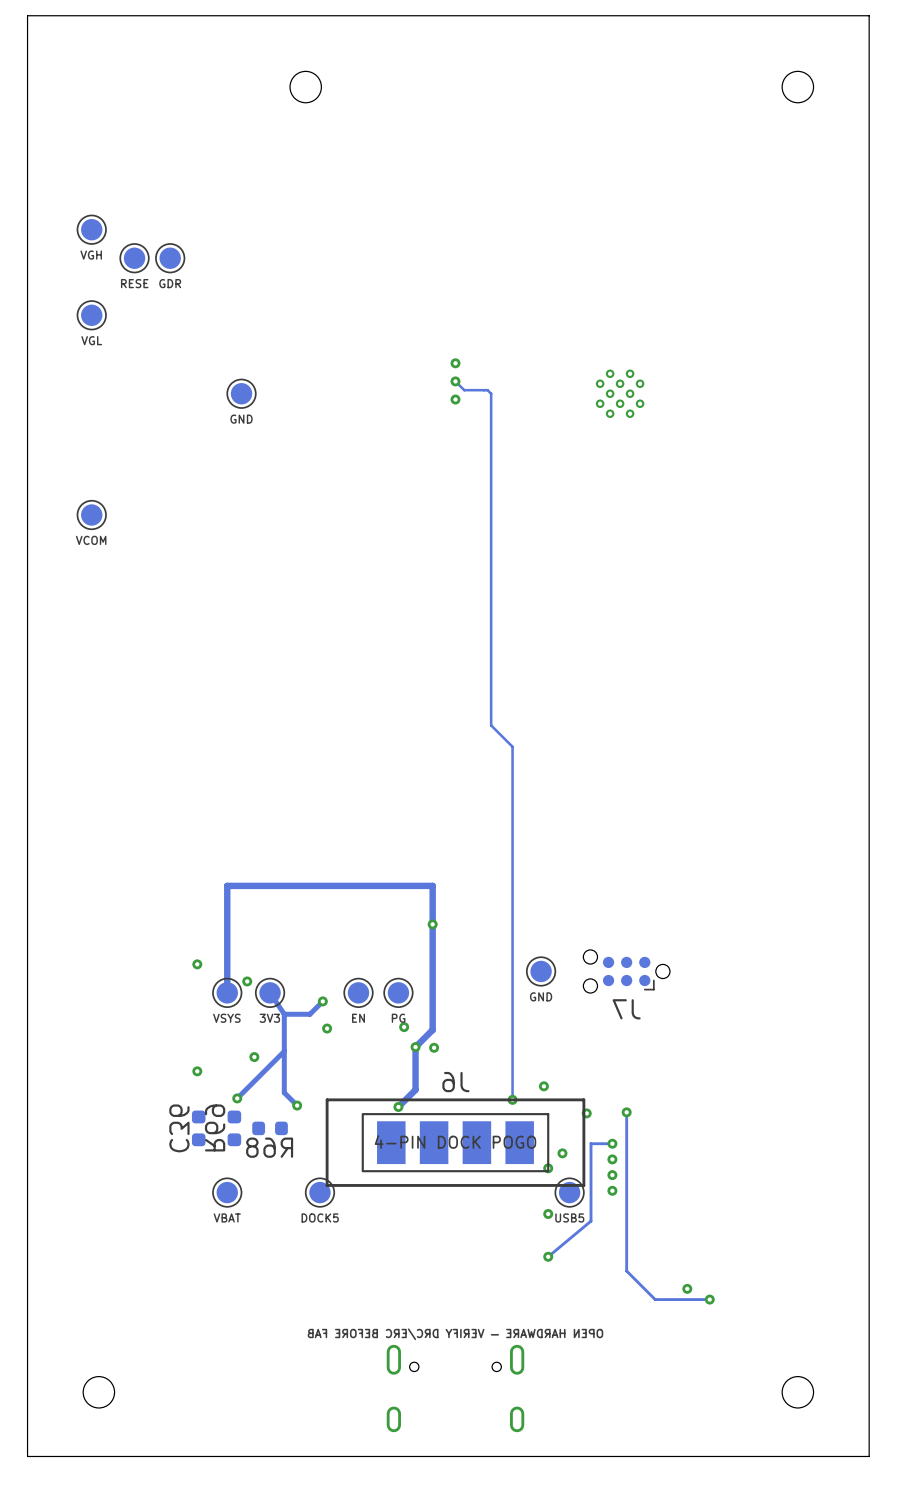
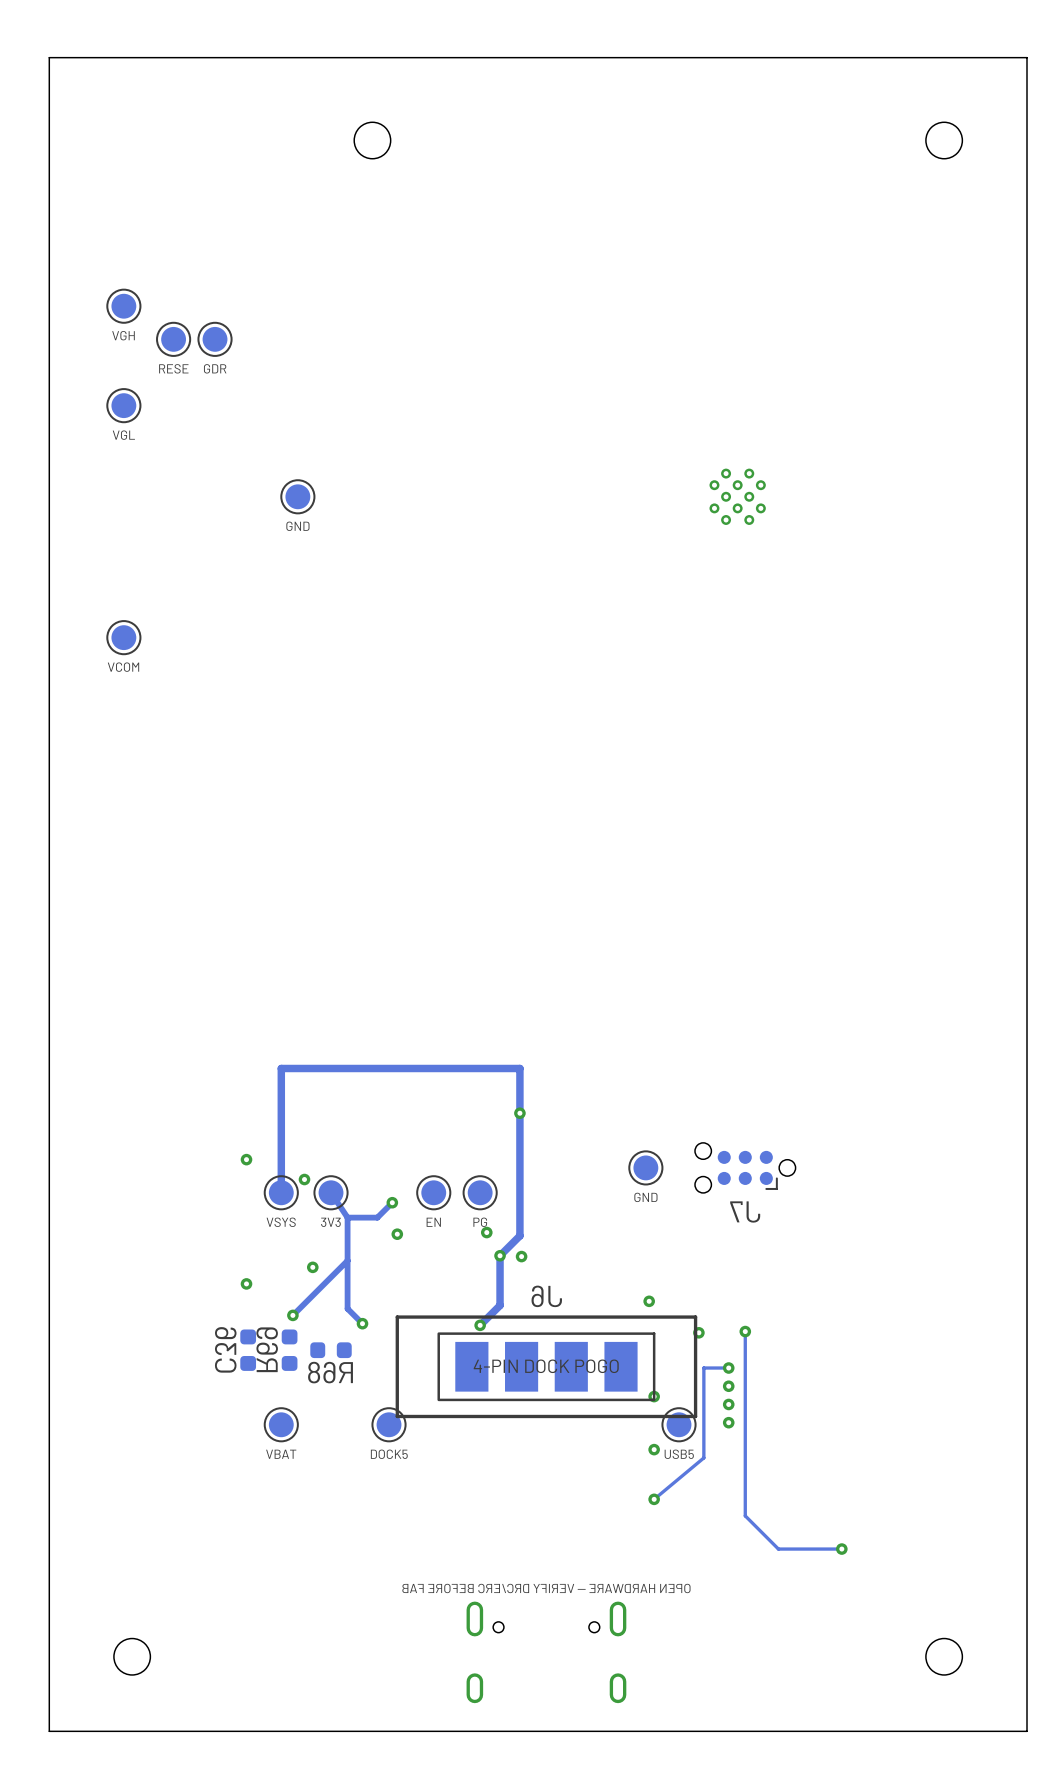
via: (455, 363) -> none
track: (455, 381) (464, 390) (487, 390) (491, 393) (491, 725) (512, 746) (512, 1099) -> none
via: (455, 381) -> none
via: (455, 399) -> none
via: (512, 1099) -> none
via: (562, 1153) -> none
via: (687, 1288) -> none

